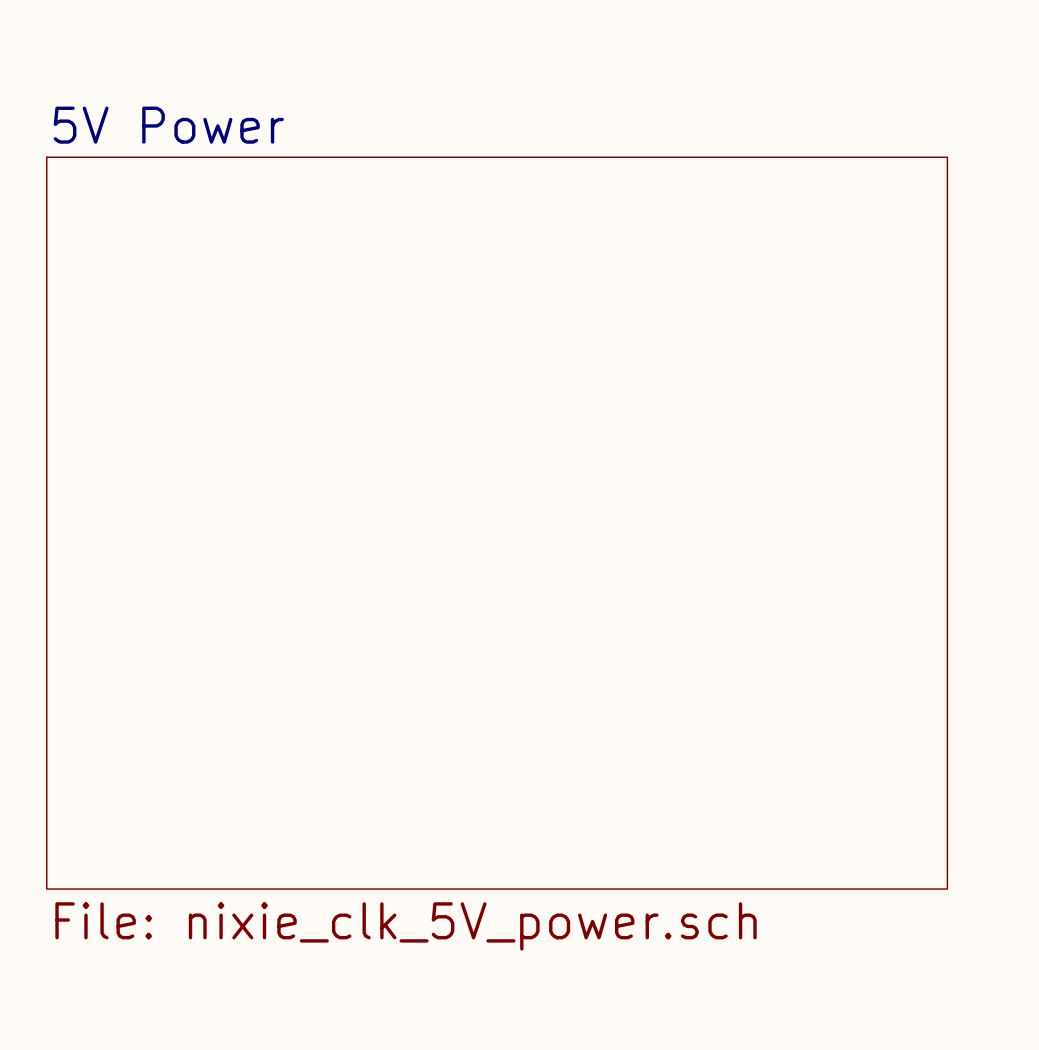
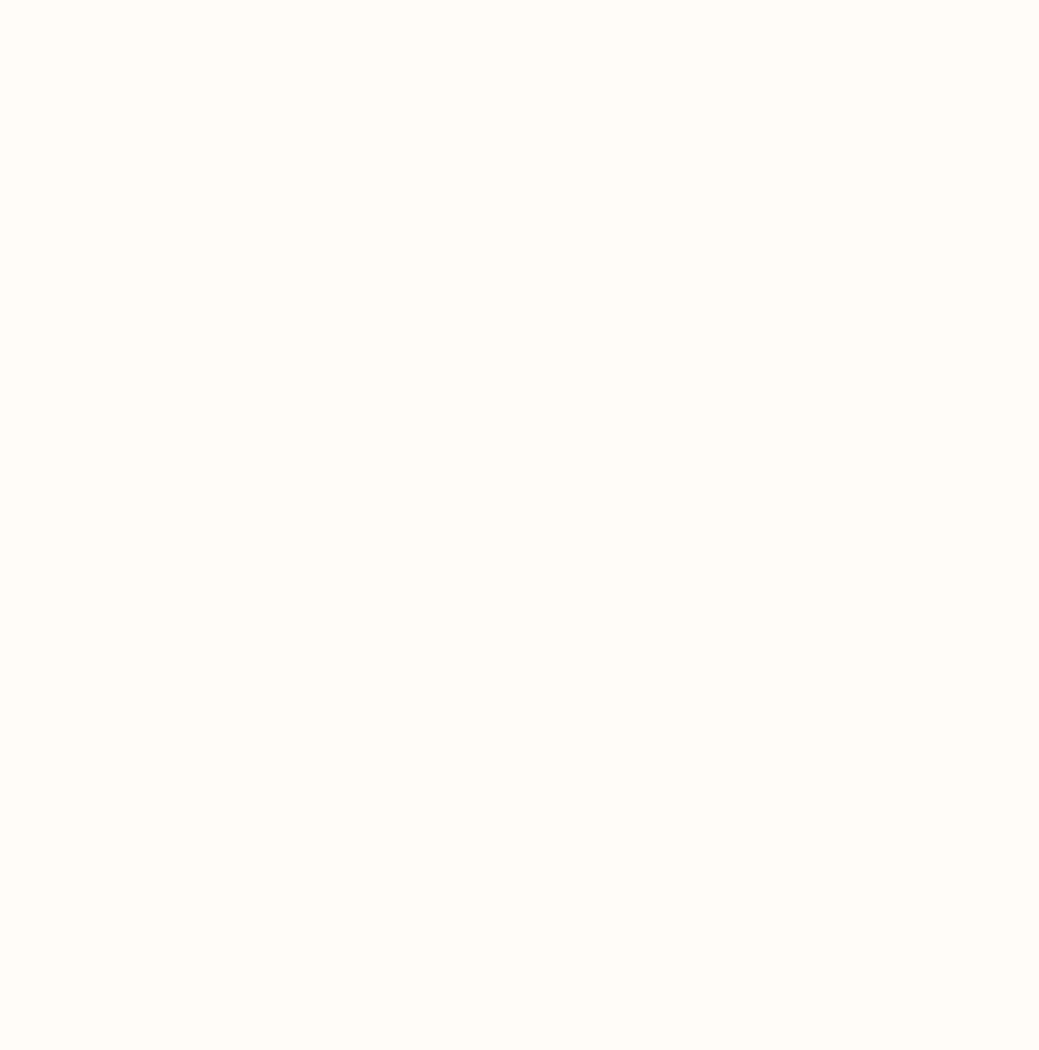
sheet 5V Power: File: nixie_clk_5V_power.sch (497, 523) -> none

